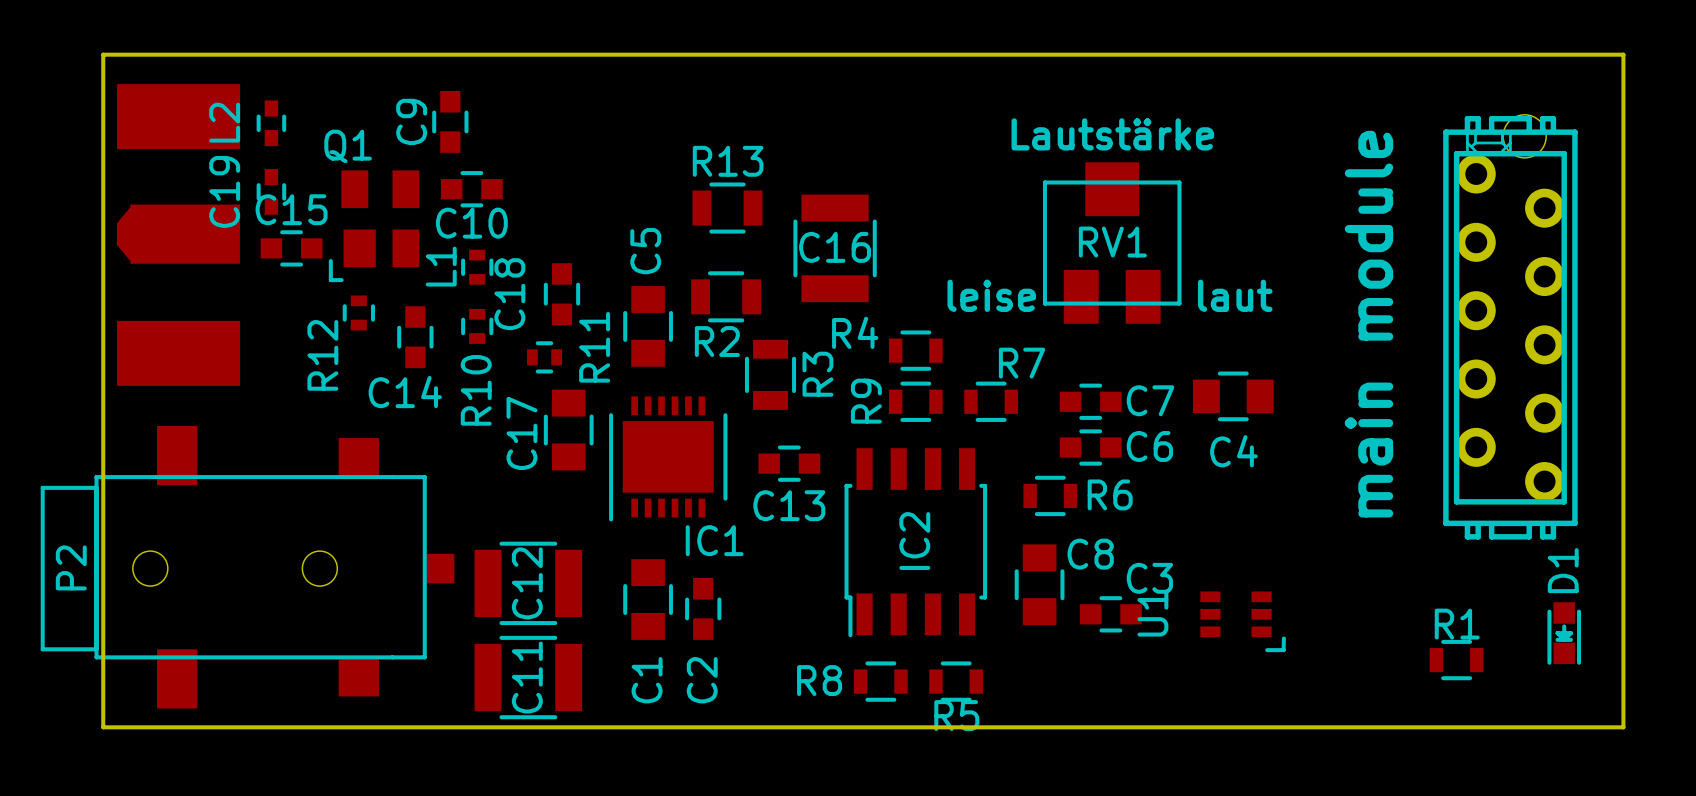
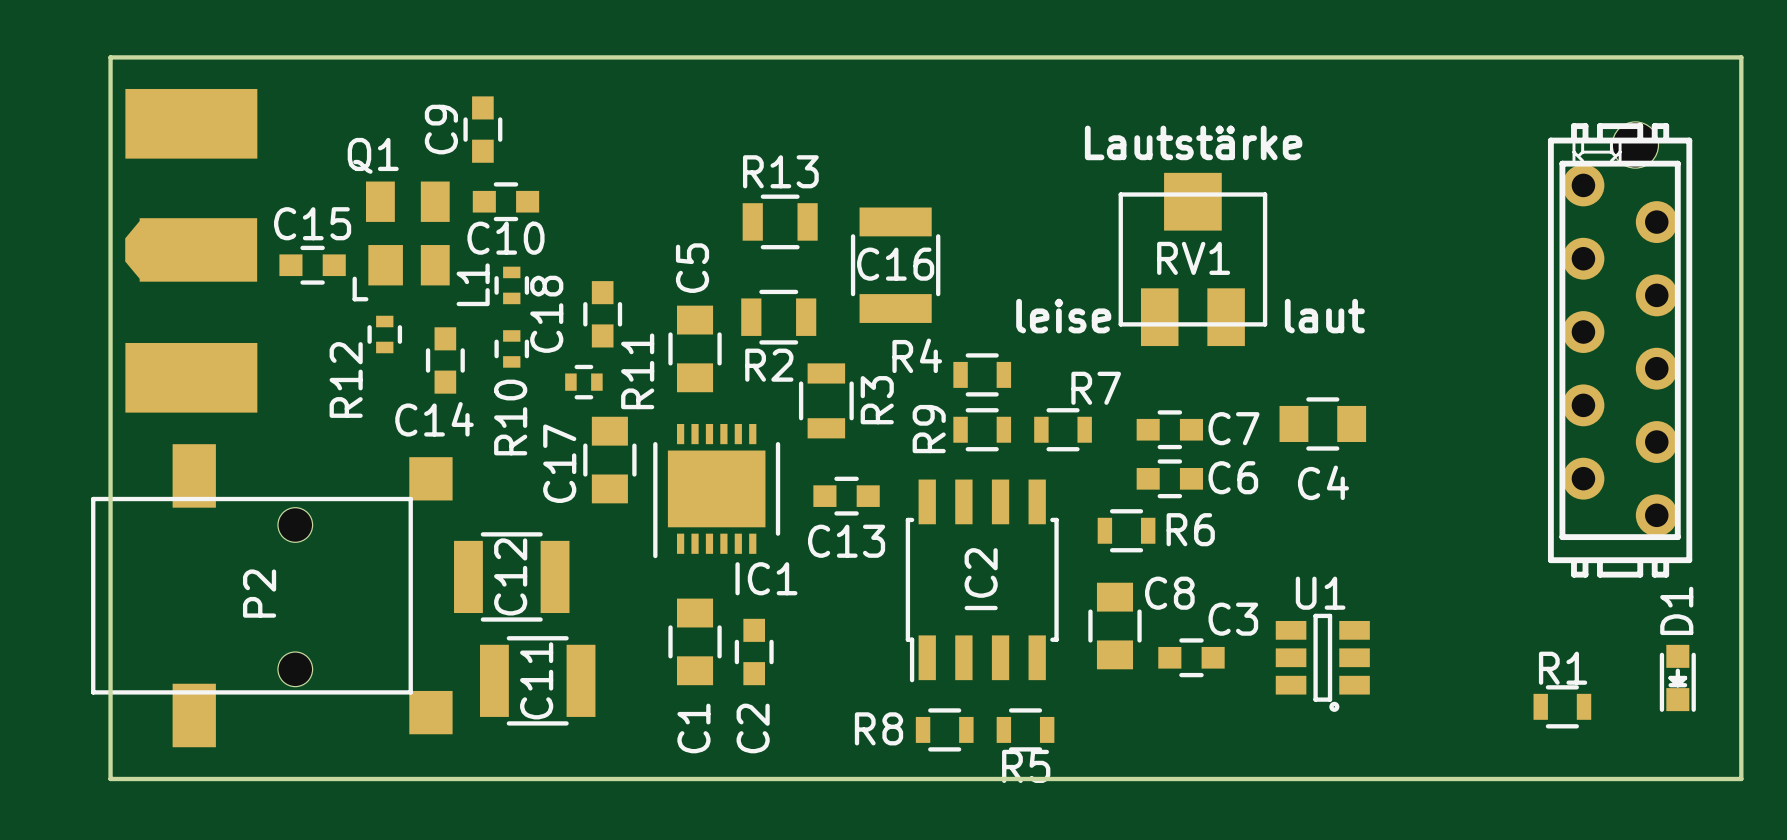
L2: (271, 123) -> none
C19: (271, 191) -> none
text: main module (1369, 324) -> none
P2 footprint: [40, 425, 455, 709] -> [91, 444, 453, 748]
P2 name position: P2 (71, 567) -> P2 (259, 593)
C12 position: (528, 583) -> (511, 576)
U1 footprint: [1200, 591, 1286, 653] -> [1275, 613, 1370, 712]
U1 name position: U1 (1152, 613) -> U1 (1320, 593)
C11 position: (528, 677) -> (537, 680)

